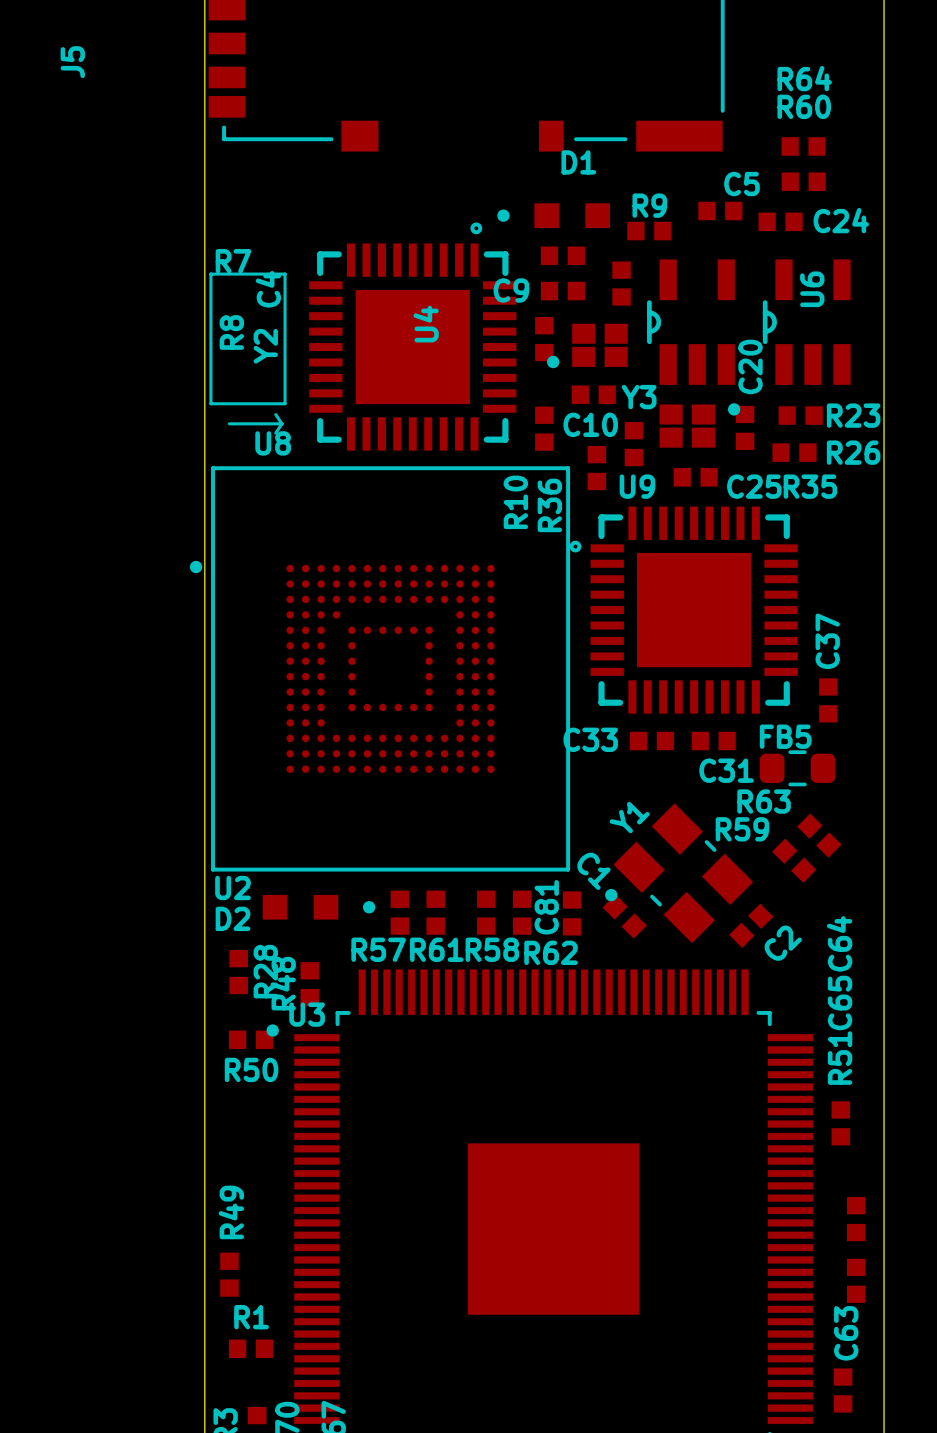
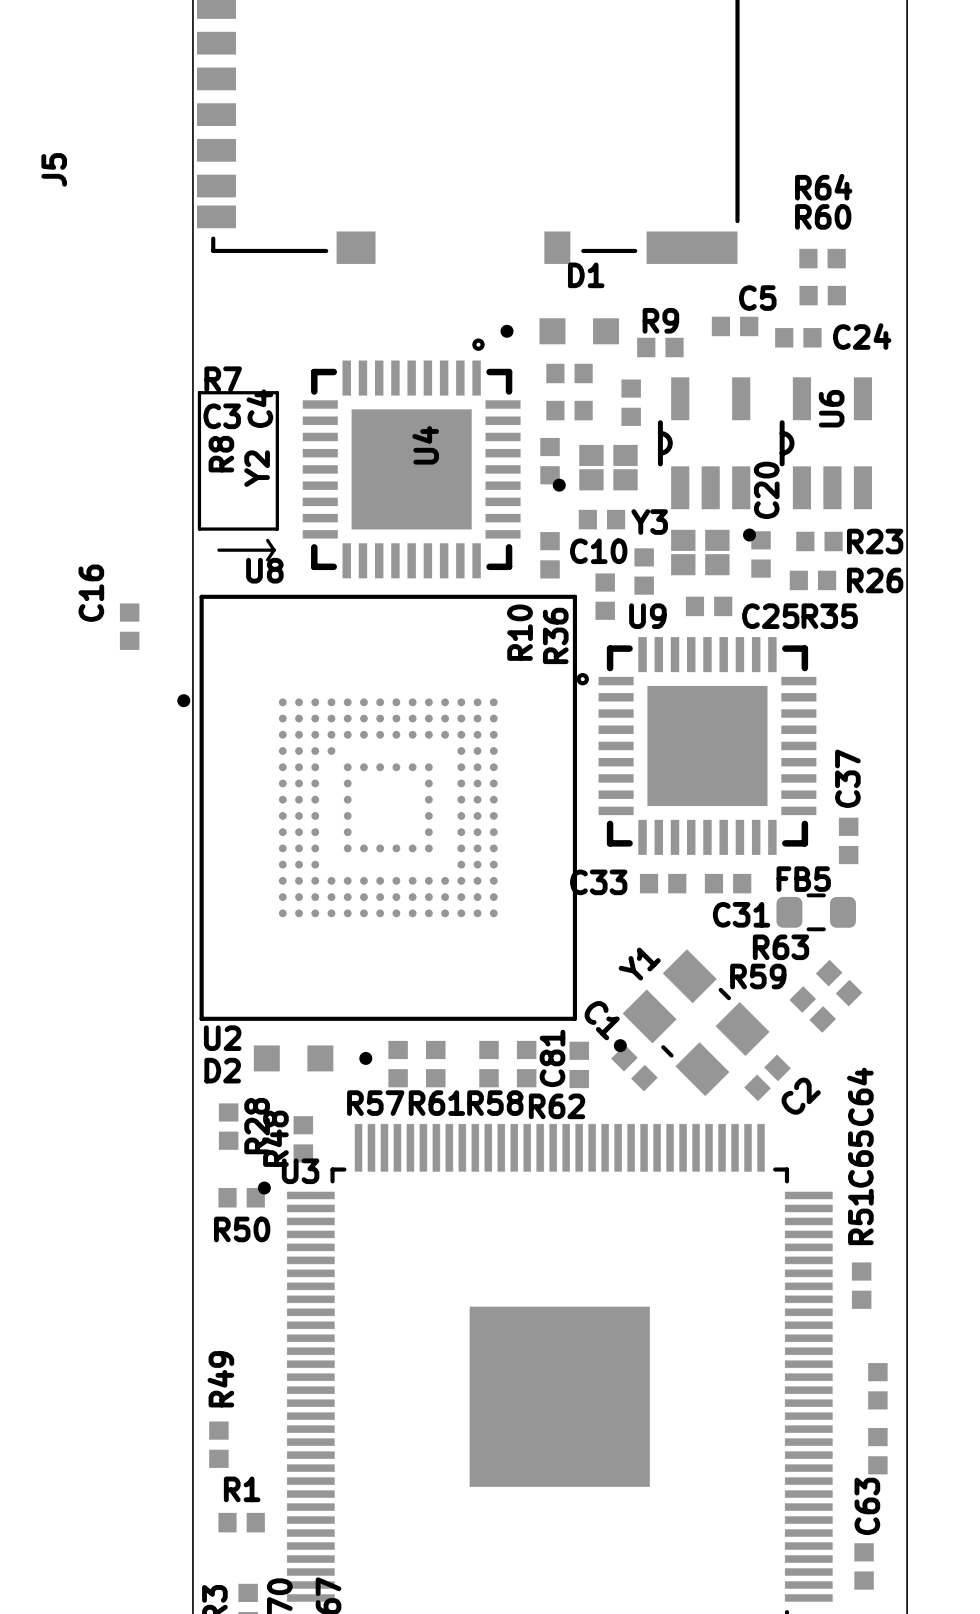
C9 name: C9 (511, 290) -> C3 (222, 416)
C16: none -> (129, 626)

